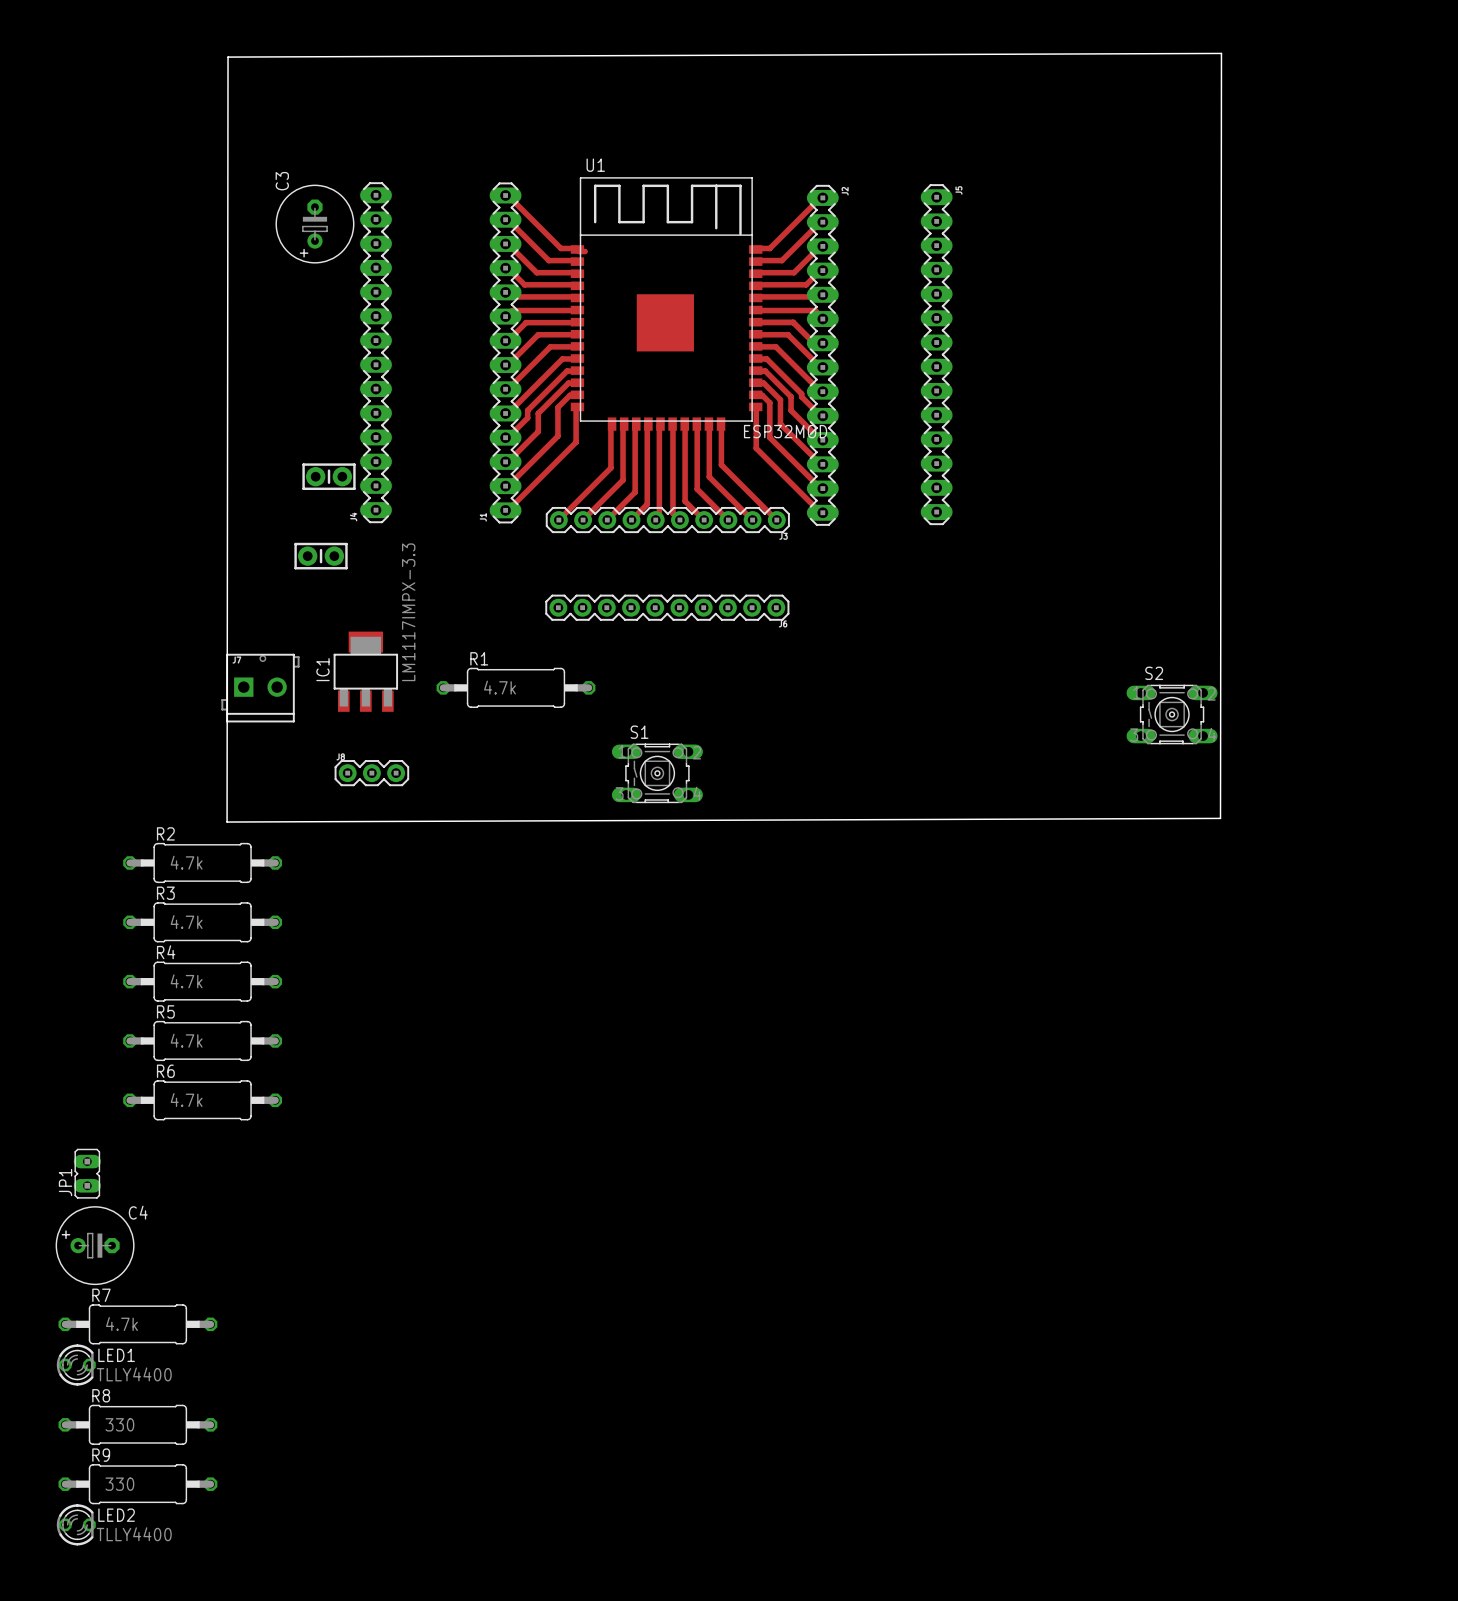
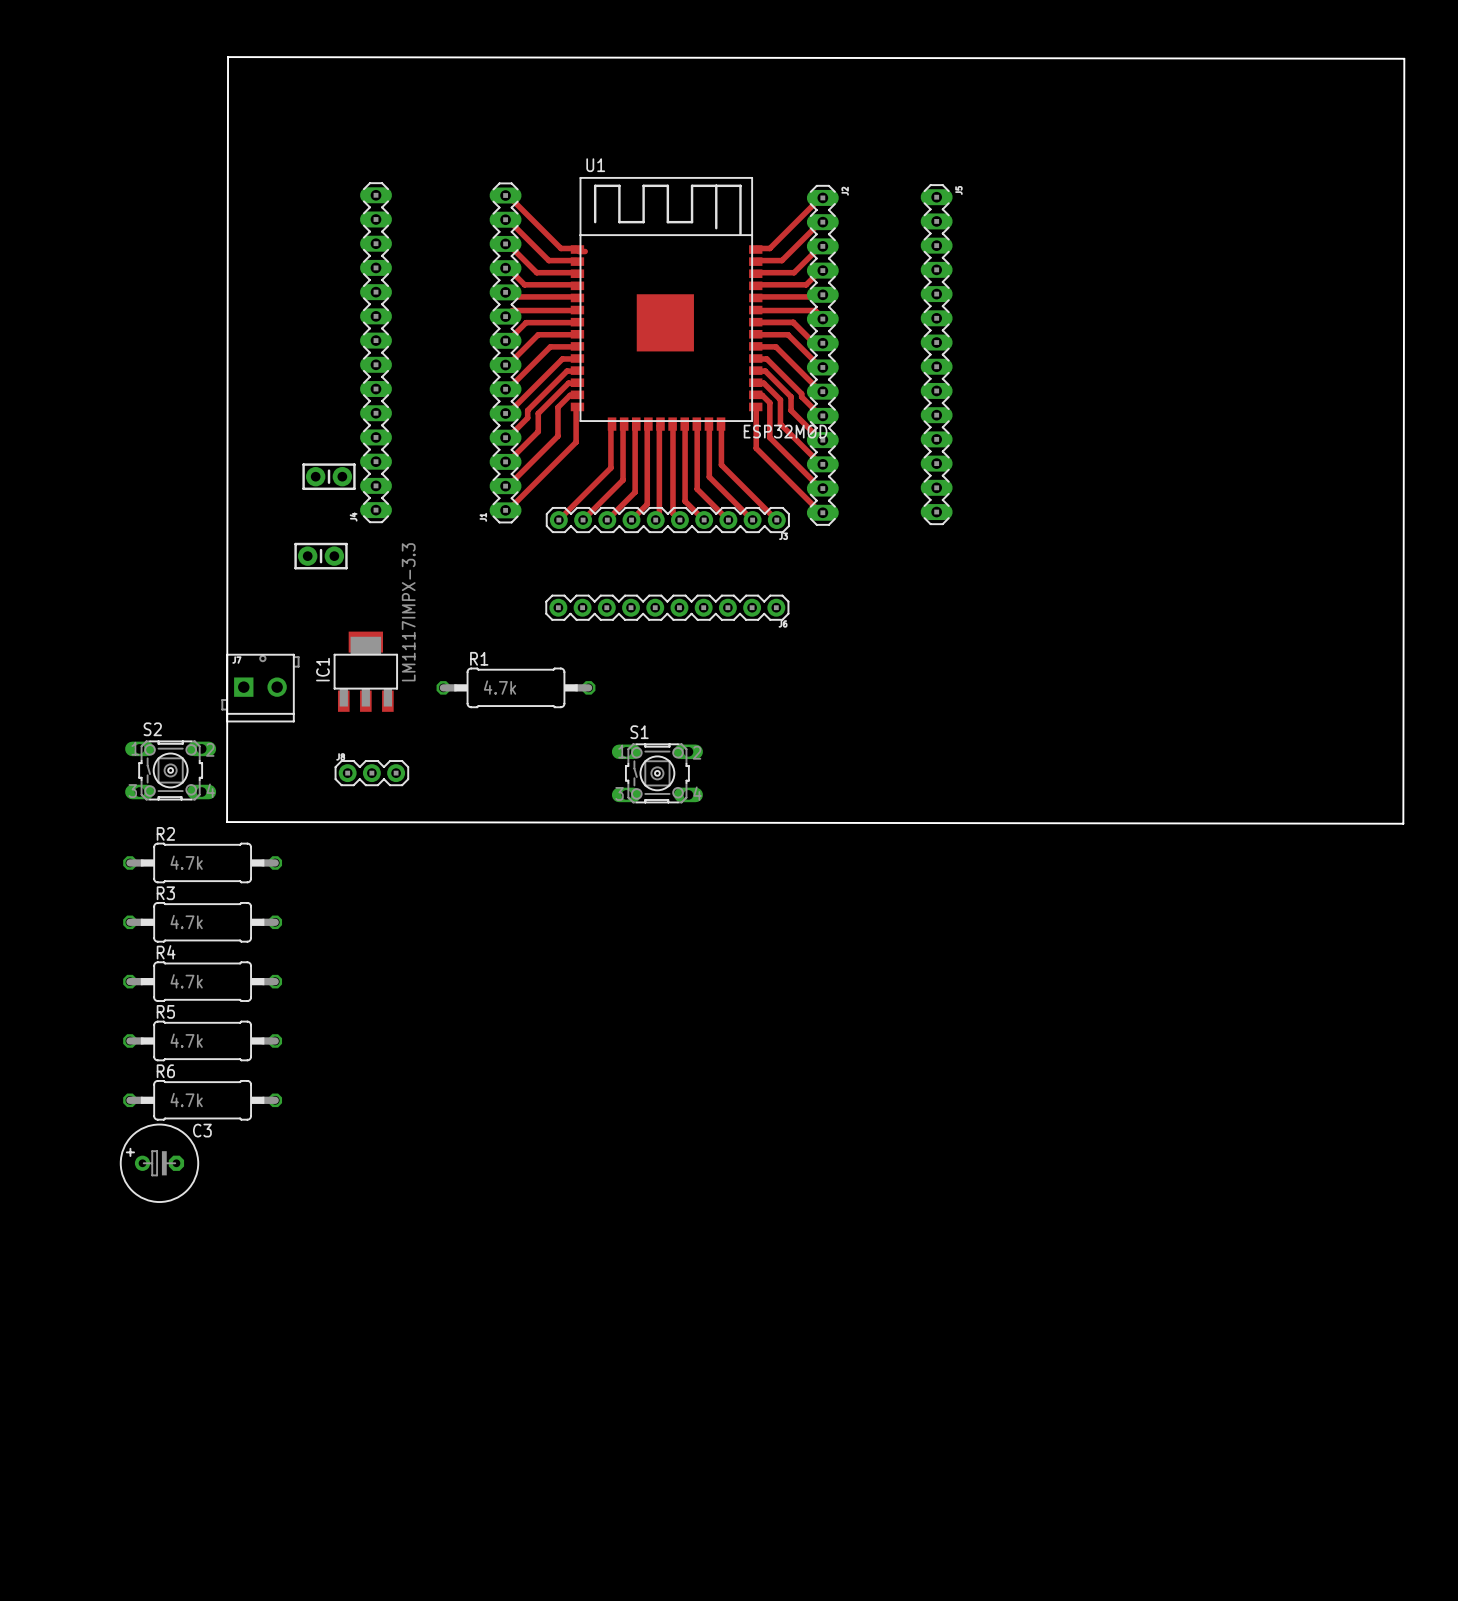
board edge: (228, 57) (1221, 53) (1220, 818) (227, 822) -> (228, 57) (1404, 58) (1403, 823) (227, 822)
C3 rotation: 0° (314, 224) -> 90° clockwise (159, 1163)
C3 position: (314, 224) -> (159, 1163)
S2 position: (1172, 714) -> (170, 770)
JP1: (87, 1173) -> none
C4: (95, 1245) -> none
R7: 4.7k (137, 1324) -> none
LED1: TLLY4400 (76, 1365) -> none
R8: 330 (137, 1424) -> none
R9: 330 (137, 1484) -> none
LED2: TLLY4400 (76, 1524) -> none

